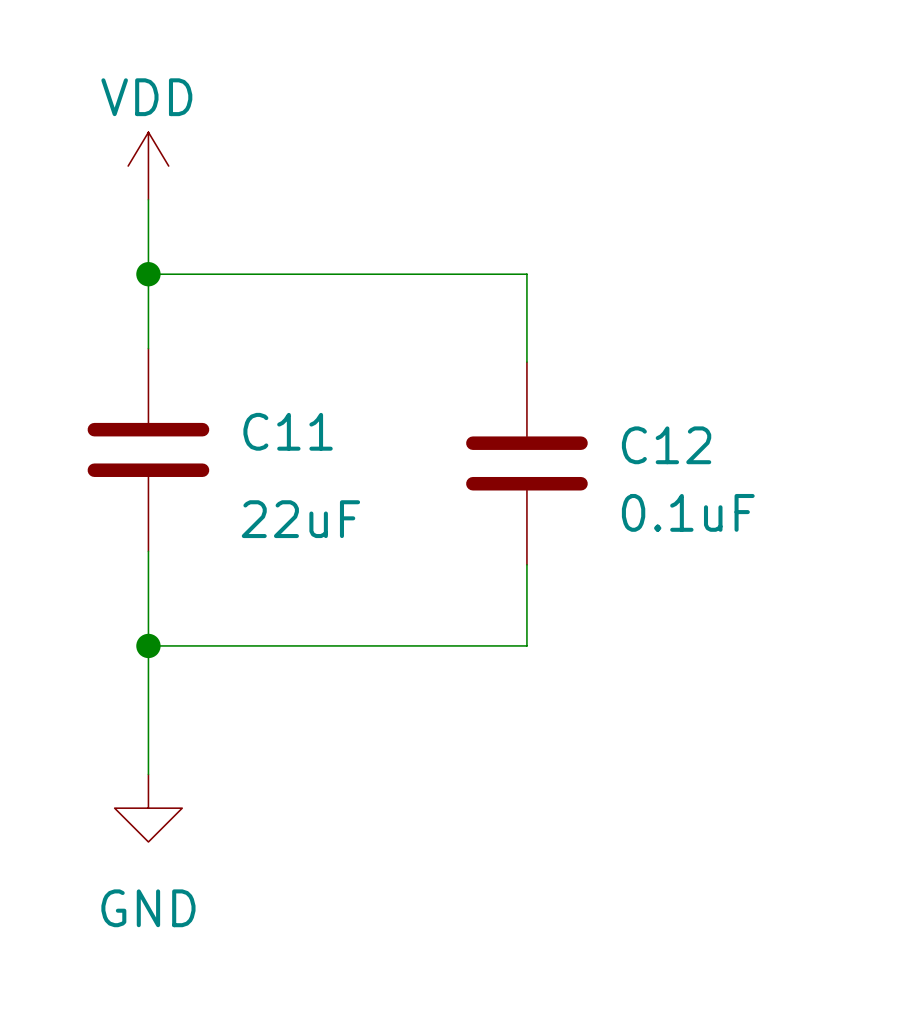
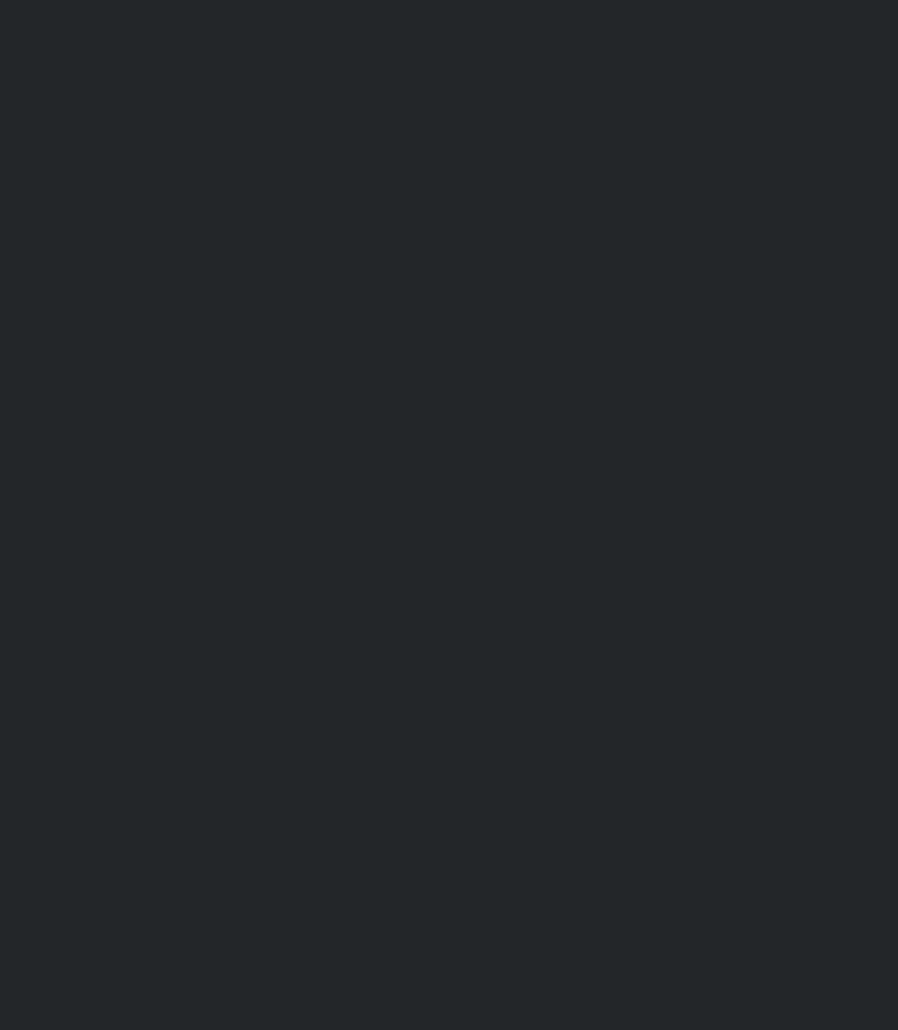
power symbol: VDD (148, 166) -> none
wire: (148, 199) (148, 348) -> none
wire: (148, 274) (526, 274) (526, 362) -> none
junction: (148, 274) -> none
C11: 22uF (148, 449) -> none
C12: 0.1uF (526, 463) -> none
wire: (148, 551) (148, 774) -> none
wire: (526, 564) (526, 645) (148, 645) -> none
junction: (148, 645) -> none
power symbol: GND (148, 808) -> none

